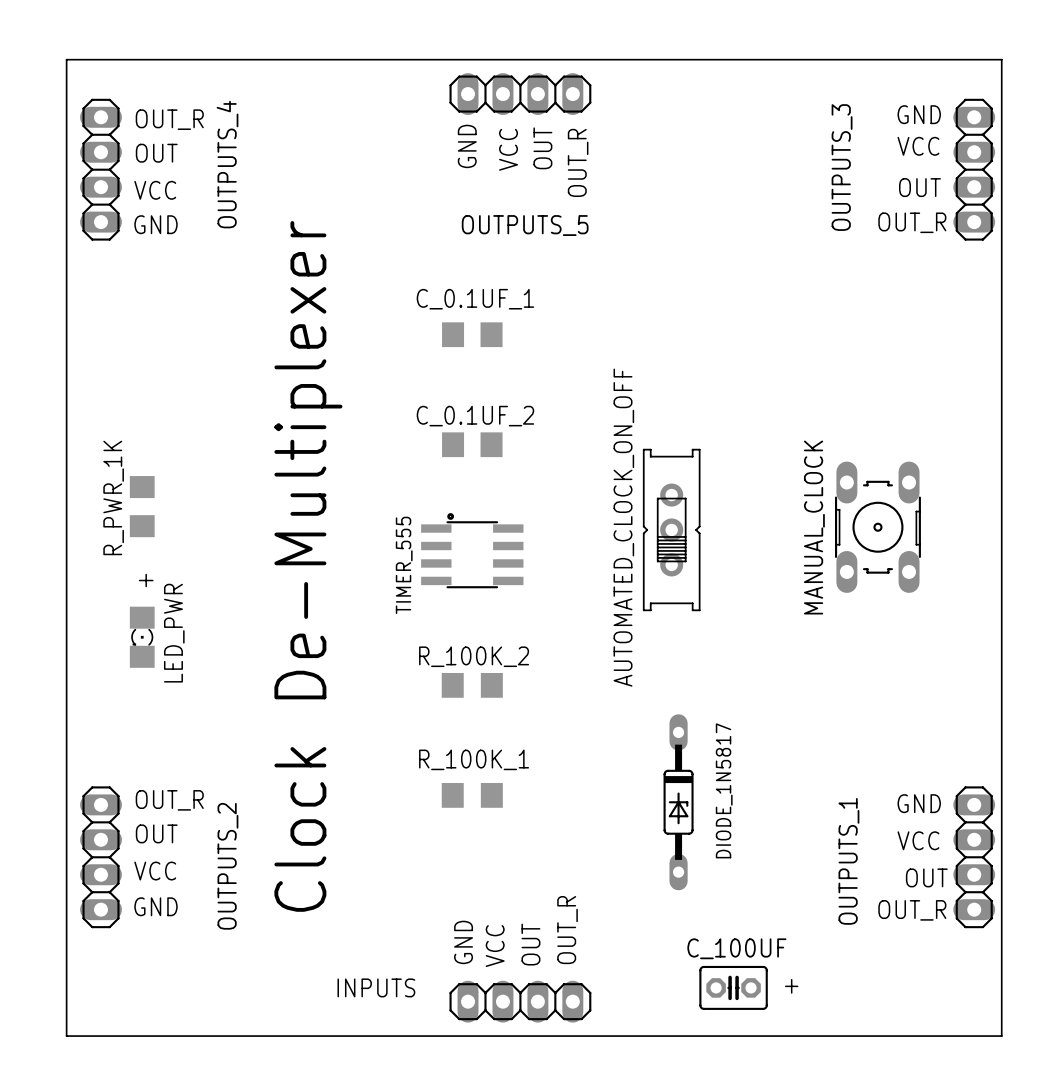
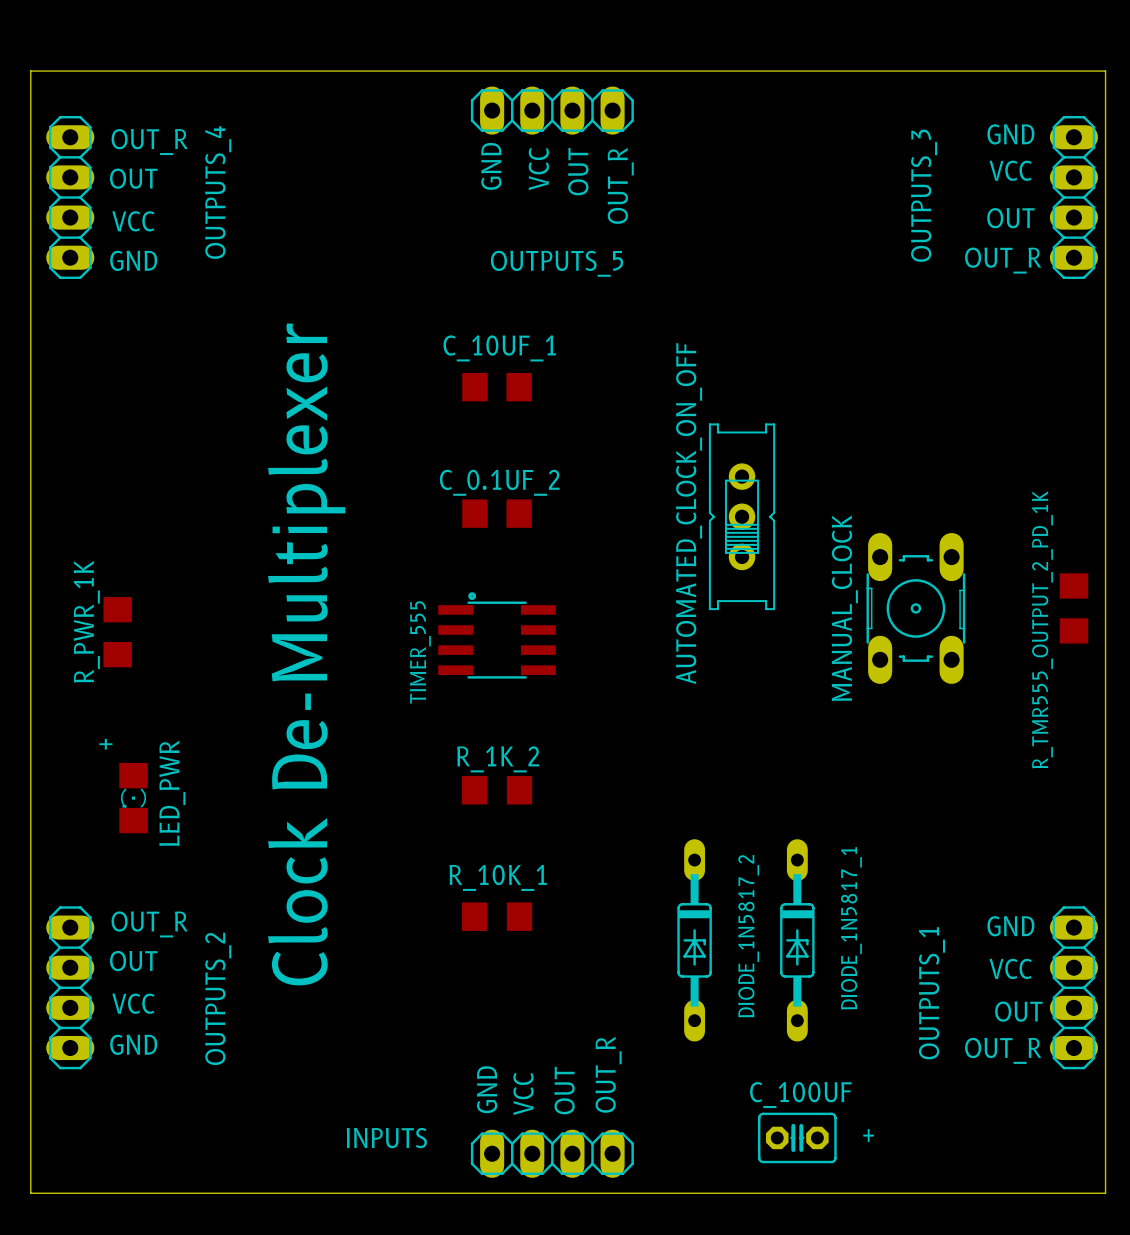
C_0.1UF_1 name: C_0.1UF_1 (475, 299) -> C_10UF_1 (499, 348)
R_PWR_1K position: (142, 506) -> (117, 632)
MANUAL_CLOCK position: (877, 527) -> (915, 608)
R_TMR555_OUTPUT_2_PD_1K: none -> (1073, 608)
AUTOMATED_CLOCK_ON_OFF position: (671, 529) -> (742, 516)
text position: + (146, 580) -> + (105, 744)
LED_PWR position: (142, 637) -> (133, 798)
R_100K_2 name: R_100K_2 (474, 656) -> R_1K_2 (498, 759)
R_100K_1 name: R_100K_1 (474, 759) -> R_10K_1 (498, 877)
DIODE_1N5817: (678, 802) -> none
DIODE_1N5817_2: none -> (694, 940)
DIODE_1N5817_1: none -> (797, 940)

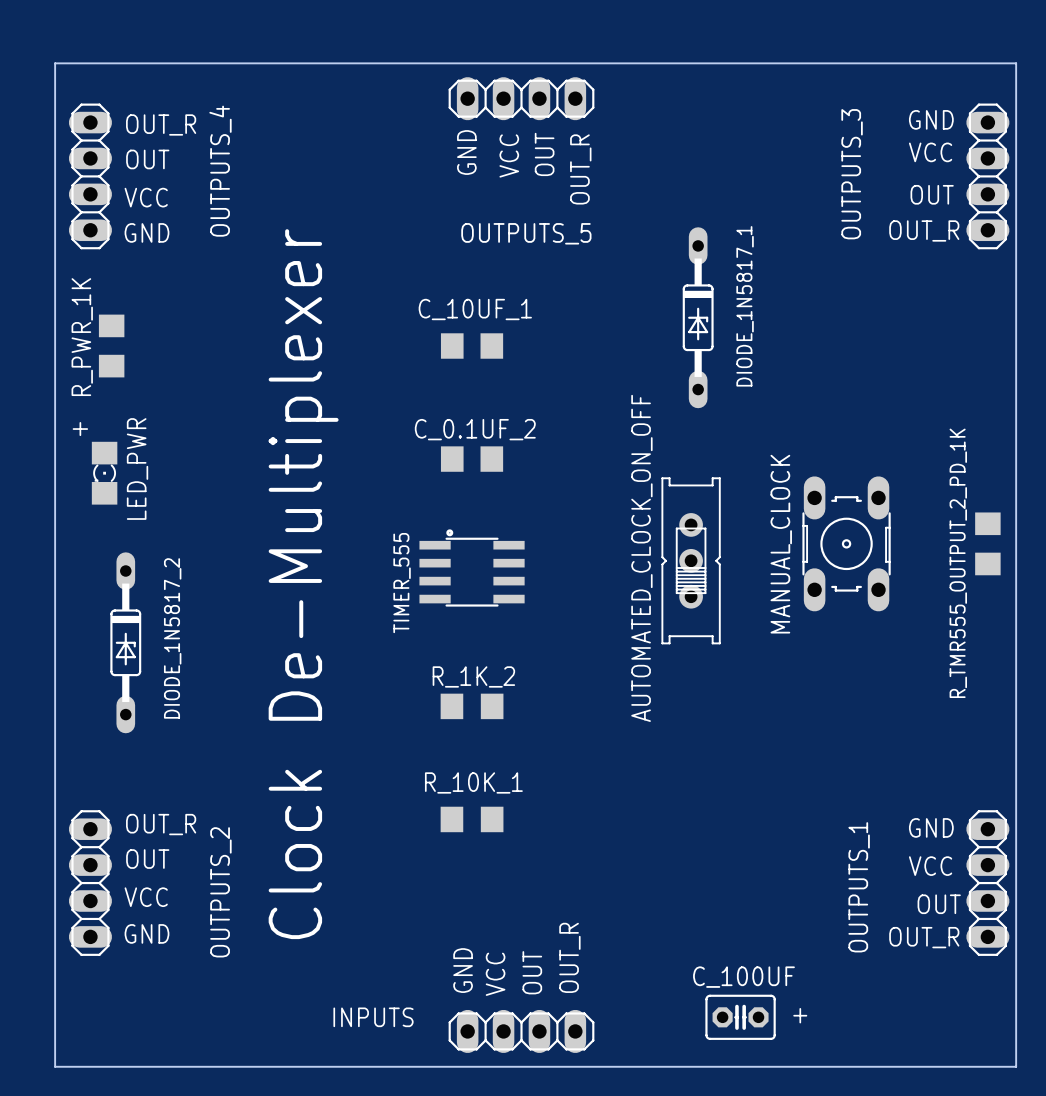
AUTOMATED_CLOCK_ON_OFF position: (742, 516) -> (691, 560)
R_PWR_1K position: (117, 632) -> (111, 346)
text position: + (105, 744) -> + (80, 429)
LED_PWR position: (133, 798) -> (104, 473)
DIODE_1N5817_2 position: (694, 940) -> (125, 642)
DIODE_1N5817_1 position: (797, 940) -> (698, 317)

